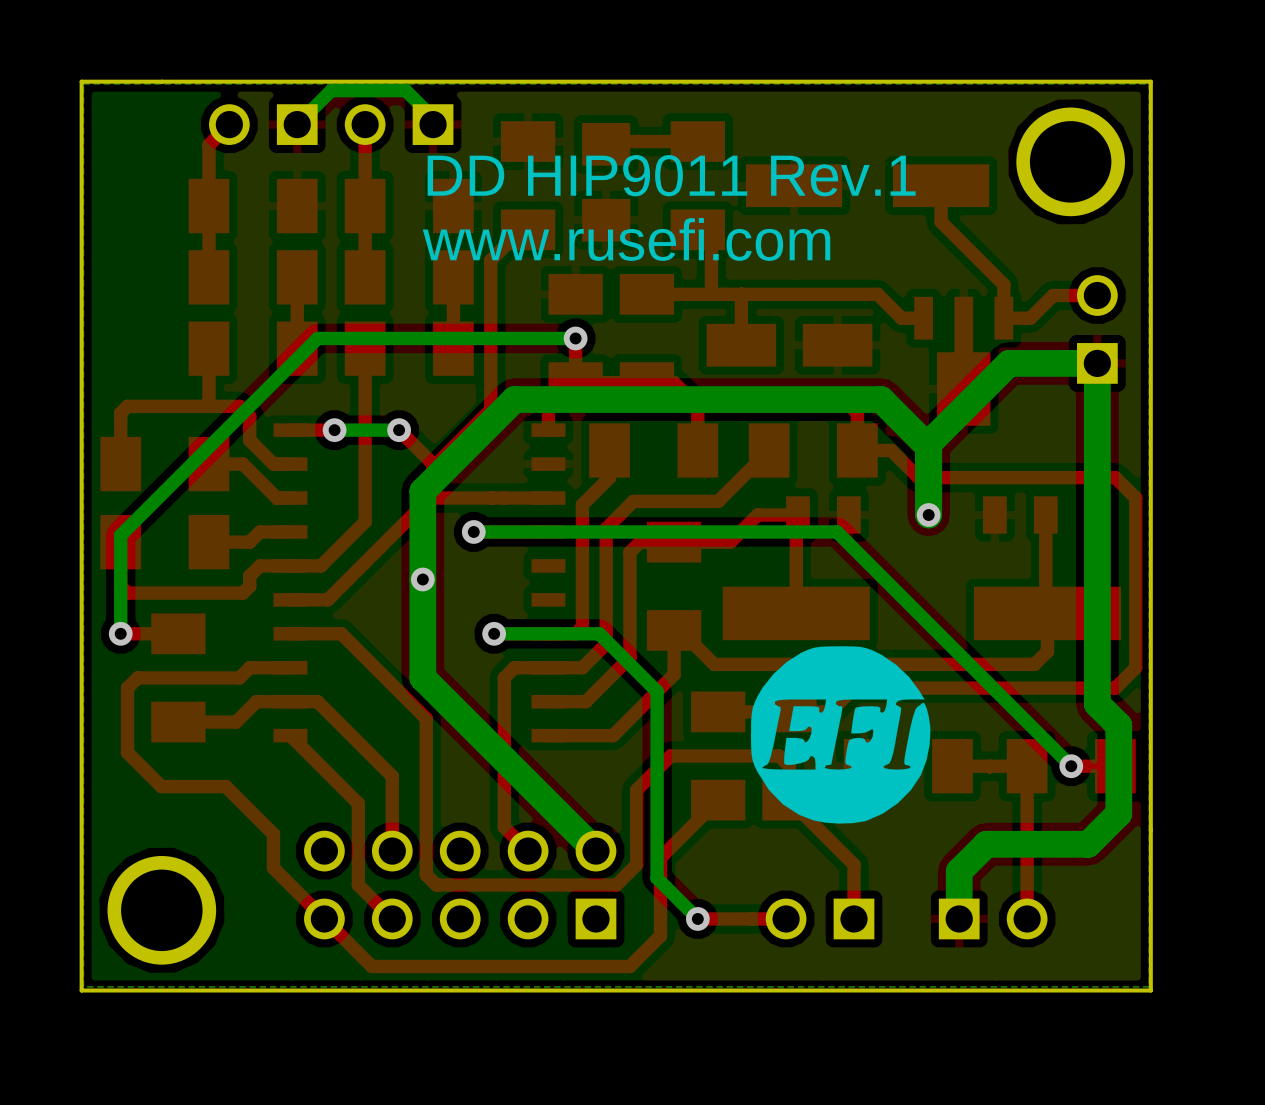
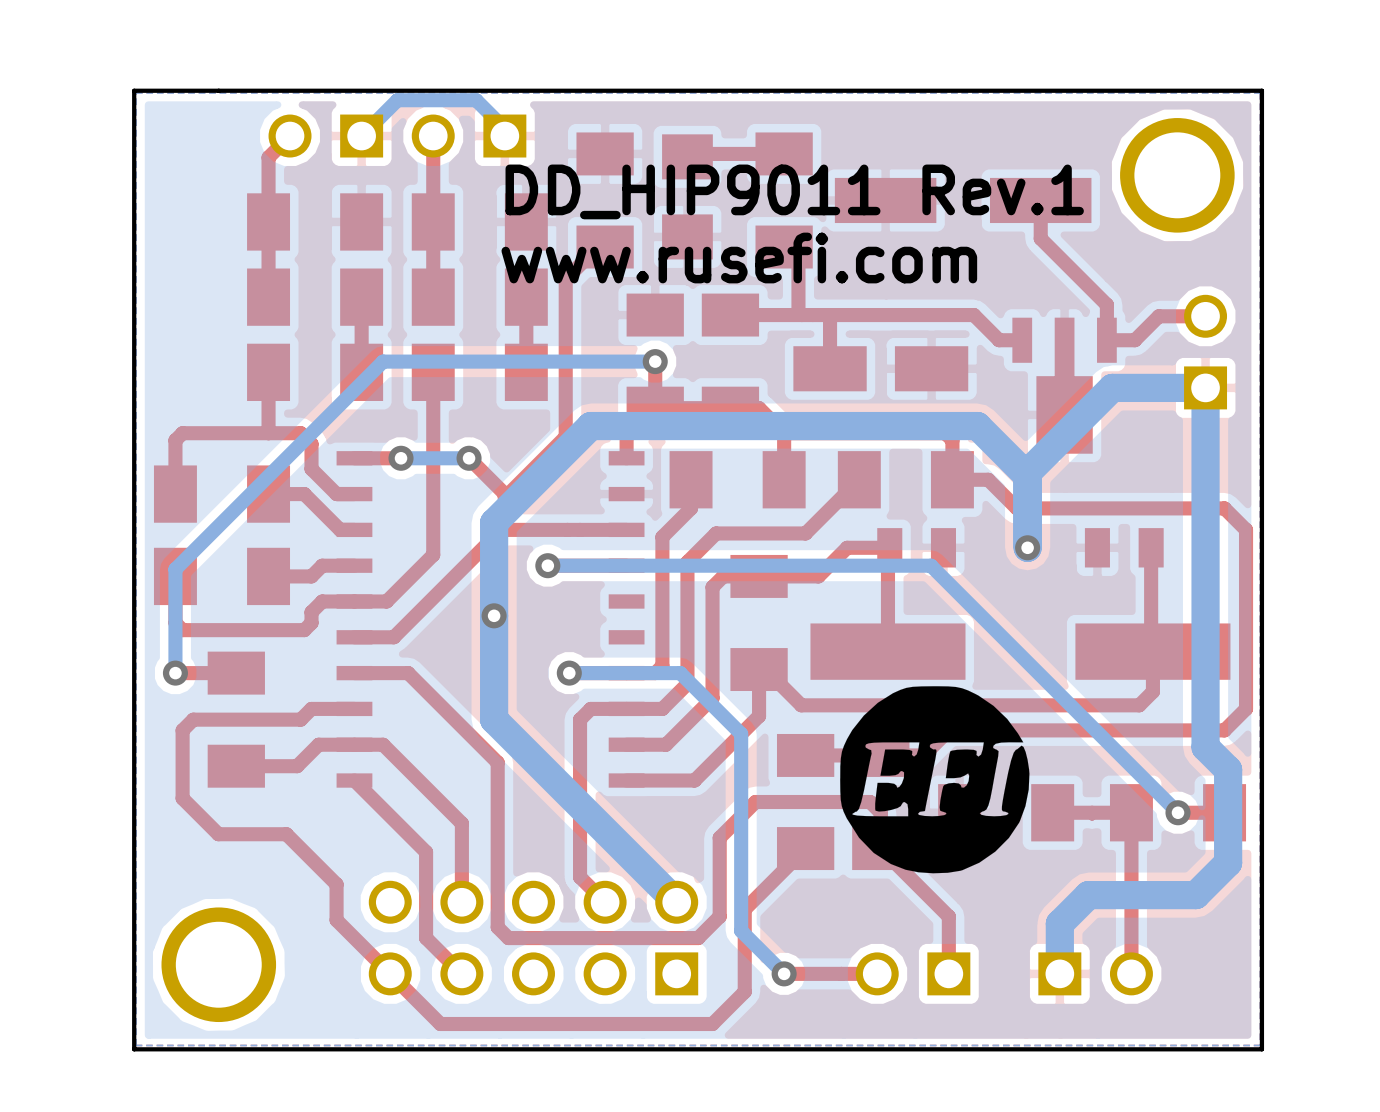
text: DD HIP9011 Rev.1 (671, 175) -> DD_HIP9011 Rev.1 (794, 191)

